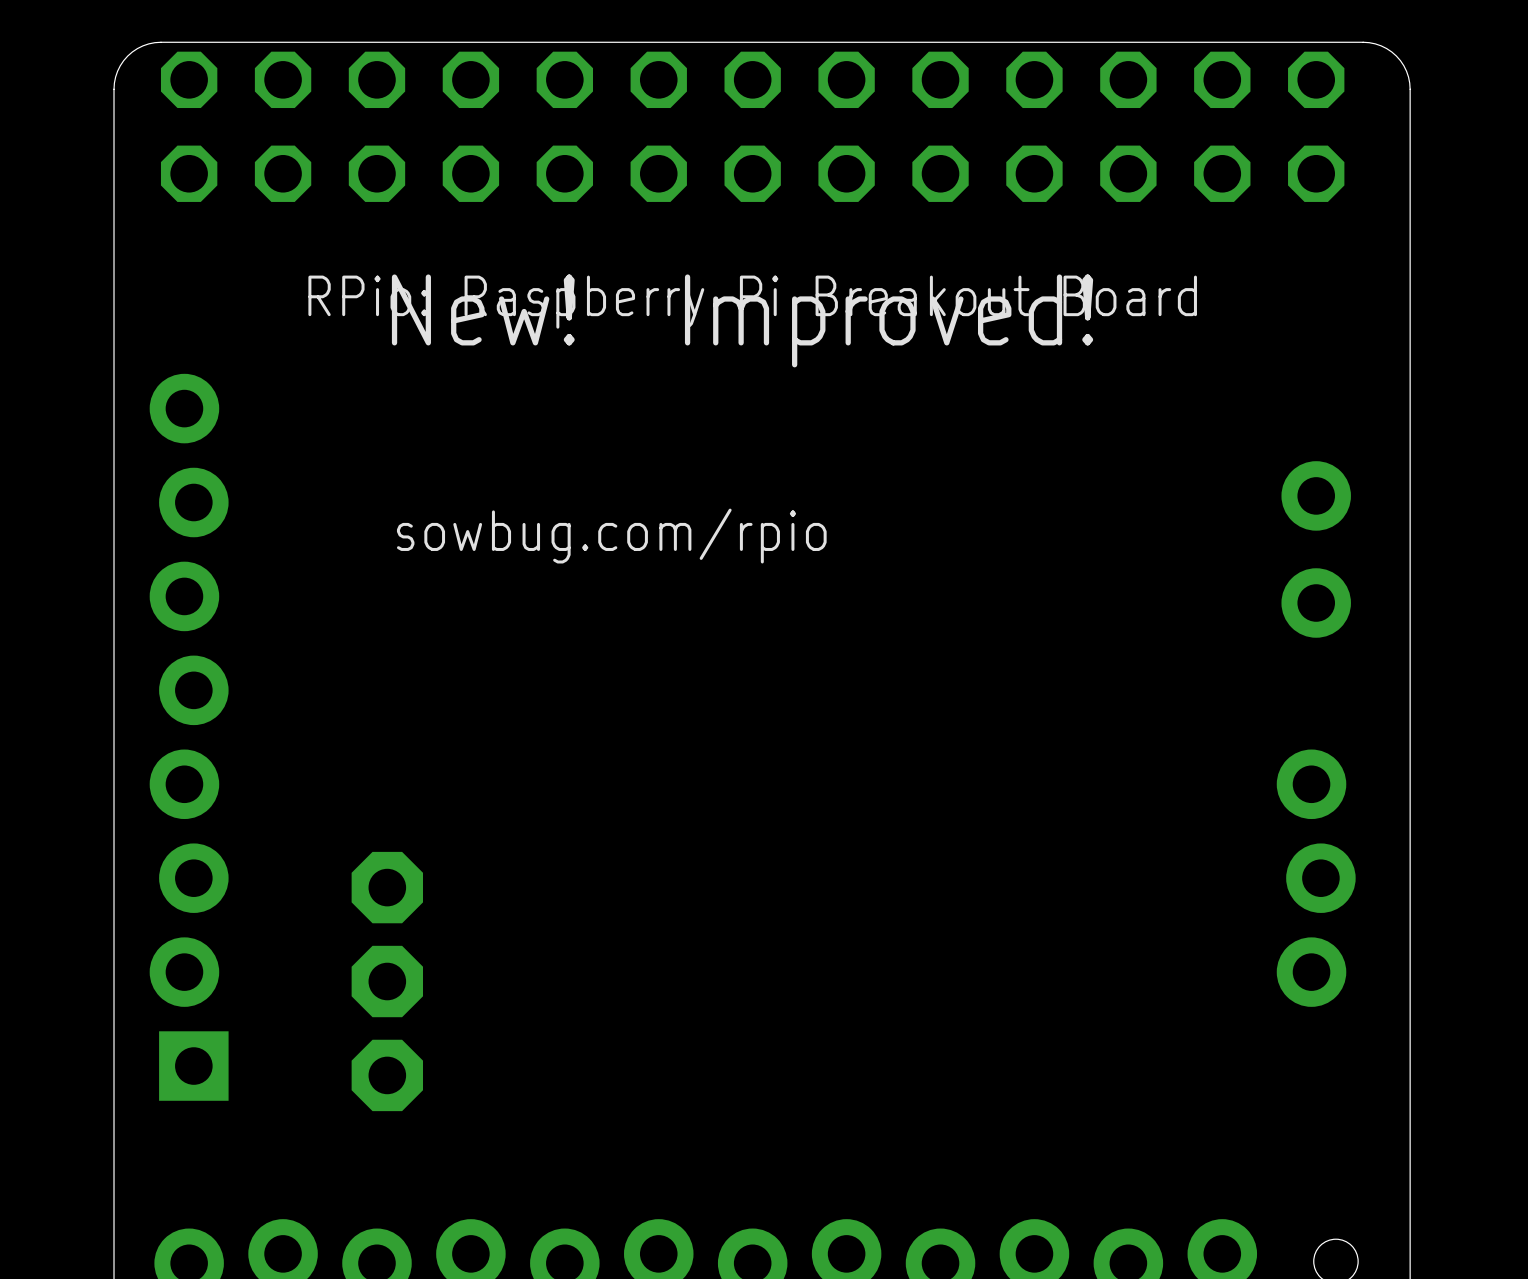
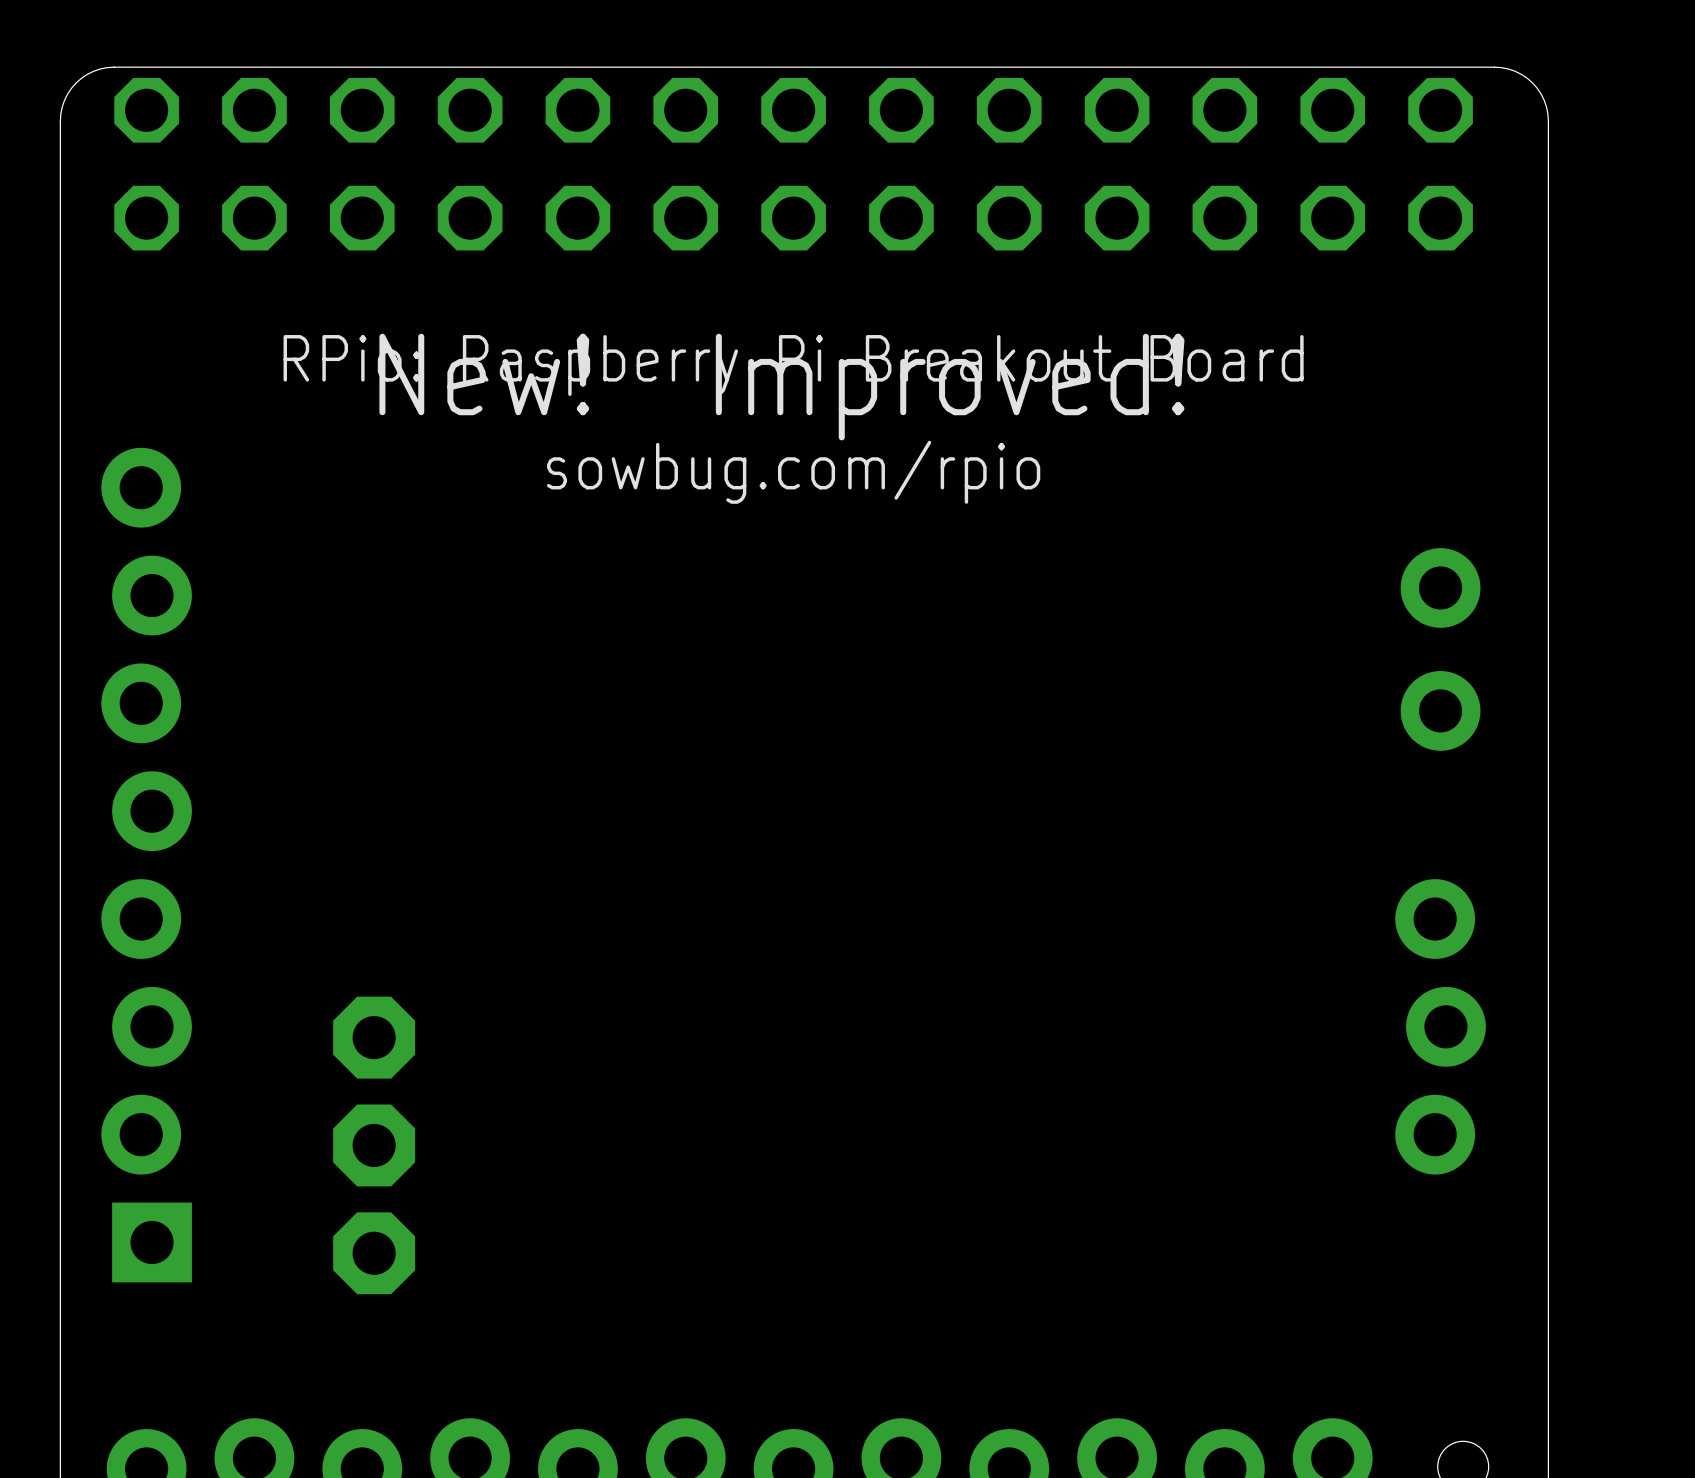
text position: sowbug.com/rpio (611, 536) -> sowbug.com/rpio (793, 472)

